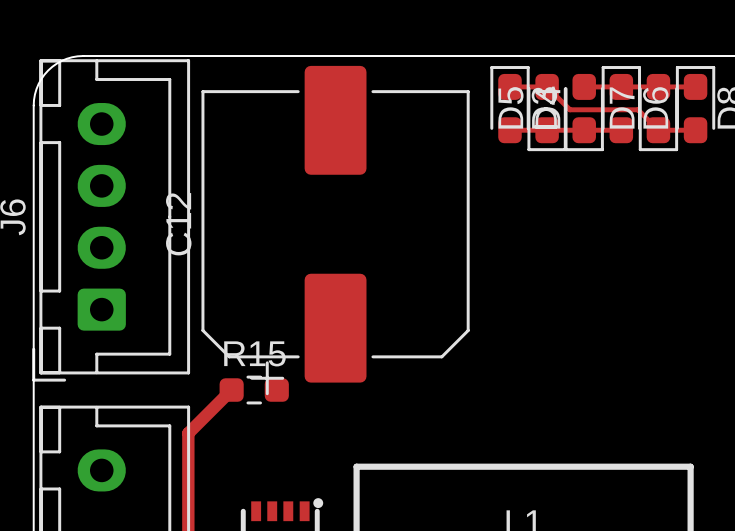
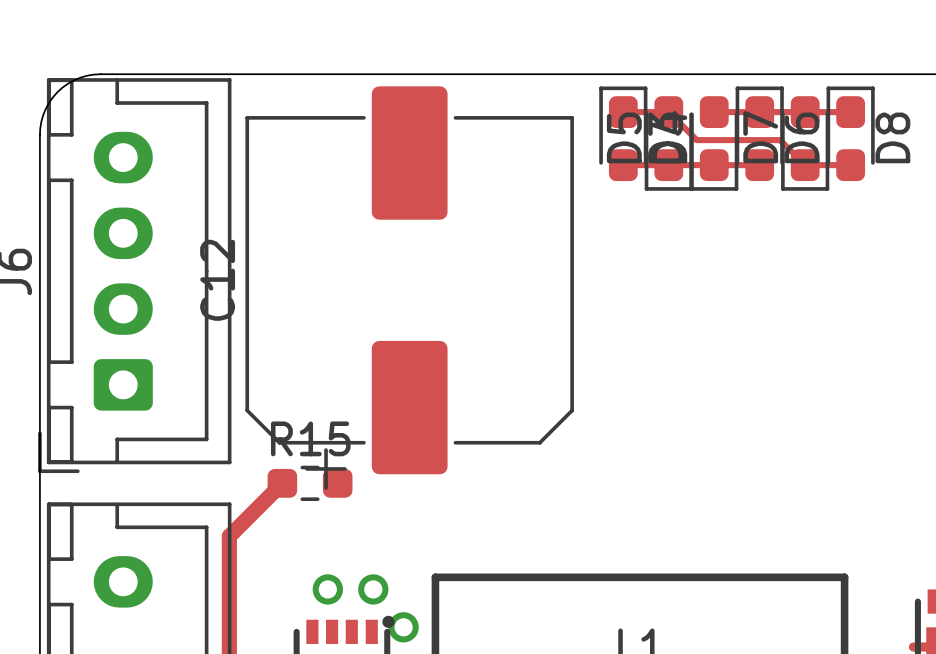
via: none -> (327, 589)
via: none -> (373, 589)
via: none -> (403, 627)

